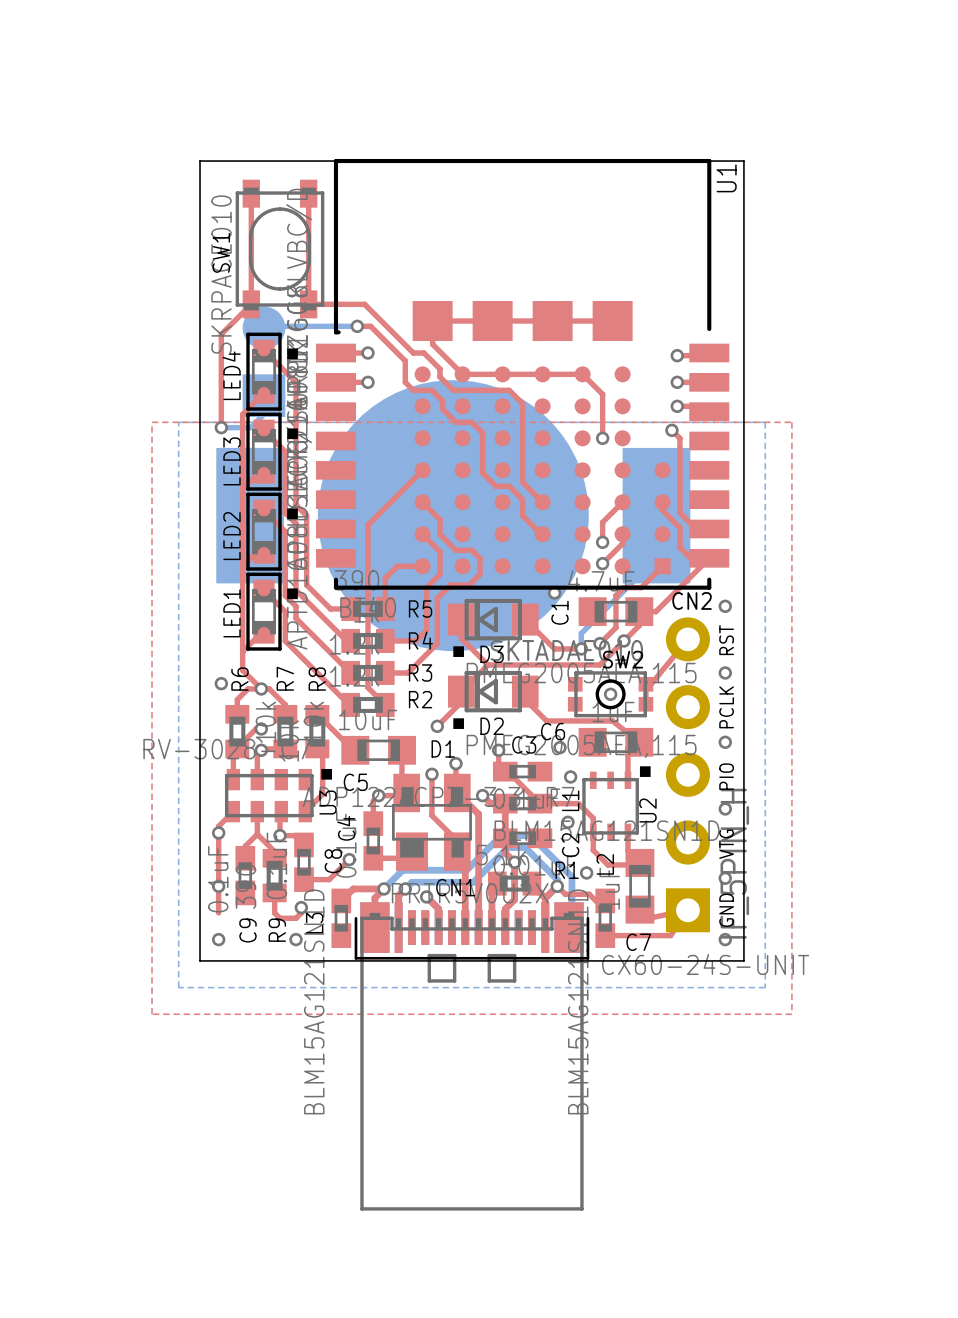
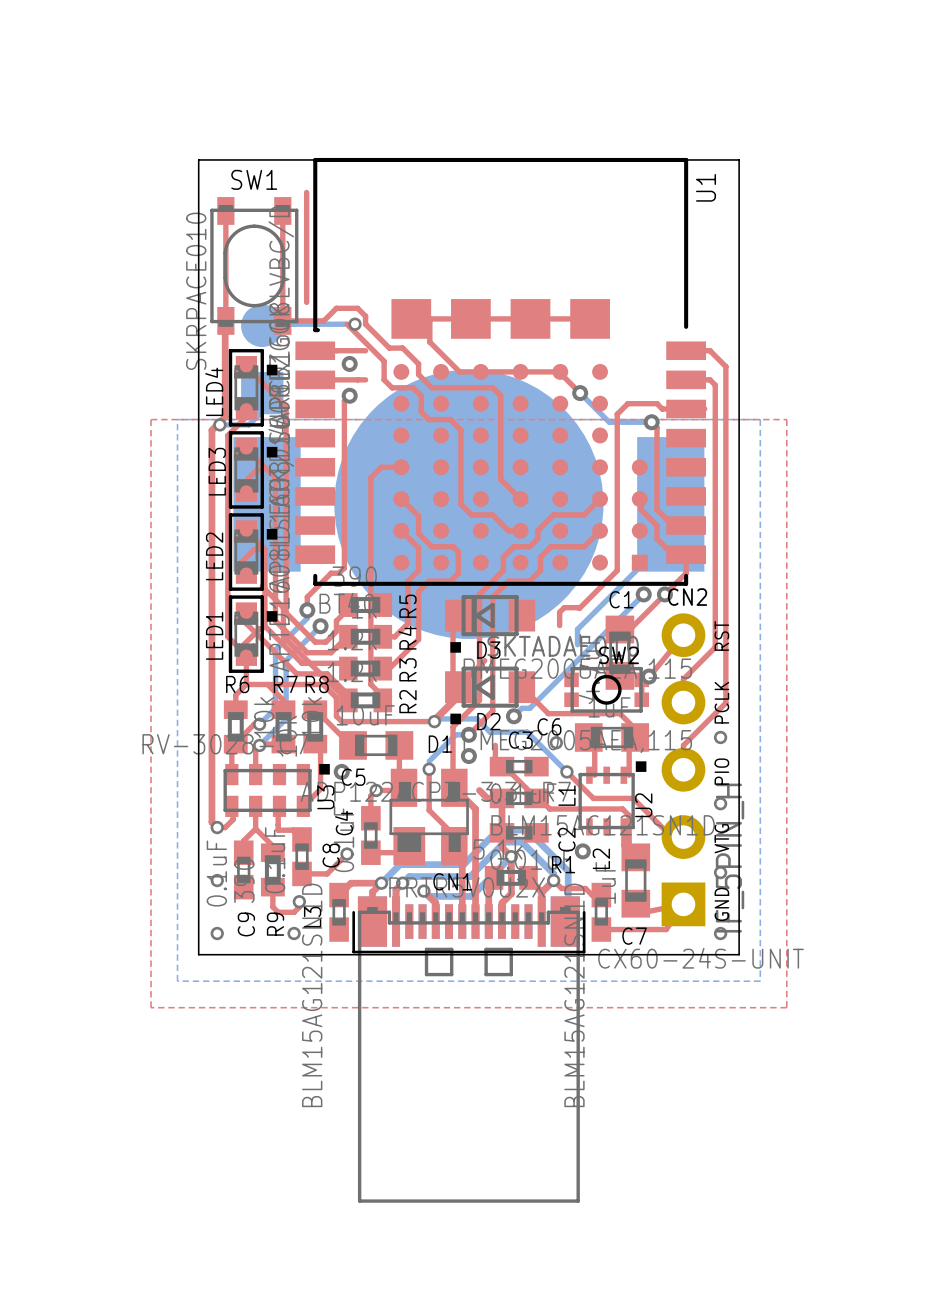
U1 name position: U1 (726, 178) -> U1 (706, 187)
top track: (251, 193) (251, 304) (221, 334) (221, 427) -> none
SW1 position: (279, 249) -> (254, 265)
SW1 name rotation: 0° (221, 252) -> 90° clockwise (254, 179)
SW1 name position: SW1 (221, 252) -> SW1 (254, 179)
top track: (311, 307) (308, 304) (364, 304) (413, 353) (423, 353) (439, 369) (439, 377) (453, 390) -> (282, 210) (282, 320) (323, 320) (336, 308) (357, 308) (365, 316) (365, 324) (389, 348) (402, 348) (418, 363) (418, 374) (431, 387) (450, 387)
top track: (357, 326) (370, 326) (405, 361) (405, 382) (413, 390) -> (347, 324) (384, 361) (384, 379) (392, 387) (410, 387)
top track: (263, 350) (295, 382) (295, 504) (306, 515) (306, 584) (330, 608) (350, 608) -> none
drawing position: (292, 353) -> (272, 370)
via: (367, 353) -> none
top track: none -> (686, 350) (709, 350) (725, 366) (725, 703) (683, 745) (683, 769)
via: (677, 355) -> none
via: none -> (349, 363)
top track: none -> (246, 366) (286, 406) (286, 612) (315, 642) (325, 642) (336, 631) (336, 620) (353, 605)
LED4 position: (263, 371) -> (246, 387)
U1 position: (522, 374) -> (500, 371)
top track: (563, 374) (582, 374) (602, 394) (602, 438) -> (560, 371) (580, 393)
via: (367, 382) -> none
via: (677, 382) -> none
top track: none -> (704, 379) (709, 379) (715, 385) (715, 647) (683, 679) (683, 702)
top track: (415, 390) (431, 390) (442, 401) (442, 409) (455, 422) (471, 422) (482, 432) (482, 472) (495, 486) (509, 486) (522, 499) (522, 515) (543, 535) -> (413, 387) (421, 395) (421, 411) (429, 419) (450, 419) (460, 430) (460, 504) (471, 514) (492, 514) (508, 530) (520, 530)
top track: (495, 390) (509, 390) (522, 403) (522, 482) (542, 502) -> (492, 387) (500, 395) (500, 479) (520, 499)
top track: (263, 393) (242, 414) (242, 670) (261, 688) -> none
bottom track: none -> (580, 393) (609, 422) (651, 422)
via: none -> (580, 393)
top track: none -> (349, 395) (344, 401) (344, 567) (339, 573) (331, 573) (307, 597) (307, 610)
via: none -> (349, 395)
via: (677, 406) -> none
top track: none -> (246, 408) (246, 416) (227, 435) (227, 636) (246, 655) (246, 684)
top track: none -> (686, 408) (662, 408) (656, 403) (627, 403) (617, 414) (617, 570) (579, 608) (564, 607) (559, 612) (559, 625)
top track: none -> (651, 422) (656, 427) (656, 509) (672, 525) (686, 525)
via: none -> (651, 422)
top track: (263, 430) (285, 451) (285, 512) (295, 523) (295, 590) (346, 640) (350, 640) -> none
top track: (671, 430) (679, 438) (679, 512) (695, 528) (709, 528) -> none
via: (671, 430) -> none
drawing position: (292, 433) -> (272, 452)
via: (602, 438) -> none
top track: none -> (246, 448) (275, 477) (275, 620) (307, 652) (331, 652) (344, 639) (353, 636)
LED3 position: (263, 451) -> (246, 469)
LED3 name position: LED3 (231, 461) -> LED3 (217, 471)
top track: none -> (401, 467) (381, 467) (370, 477) (370, 684) (388, 700)
top track: (422, 470) (367, 524) (367, 687) (385, 704) -> none
top track: (422, 502) (439, 519) (439, 534) (455, 550) (471, 550) (479, 558) (479, 574) (469, 584) (453, 584) -> (401, 499) (418, 516) (418, 533) (431, 546) (453, 546) (458, 552) (458, 573) (450, 581)
top track: none -> (600, 499) (584, 514) (553, 514) (537, 530) (537, 538) (529, 546) (513, 546) (503, 557) (503, 570) (479, 594) (479, 700) (453, 726) (453, 758)
top track: (622, 502) (602, 522) (602, 542) -> none
top track: (662, 502) (662, 510) (679, 527) (679, 547) (690, 558) (709, 558) (690, 576) -> (639, 499) (641, 509) (656, 525) (656, 538) (672, 554) (686, 554) (686, 573)
drawing: [287, 508, 298, 520] -> none
top track: (263, 510) (285, 531) (285, 595) (295, 606) (295, 618) (350, 672) -> none
part position: (453, 515) -> (468, 504)
top track: (422, 530) (422, 534) (439, 551) (439, 574) (426, 587) (426, 630) (415, 640) (397, 640) -> (401, 530) (418, 548) (418, 570) (407, 581) (407, 623) (394, 636)
LED2 position: (263, 531) -> (246, 552)
drawing: none -> [266, 528, 278, 540]
top track: none -> (246, 530) (264, 549) (264, 626) (302, 663) (348, 663) (353, 668)
top track: none -> (600, 530) (584, 546) (551, 546) (540, 557) (540, 570) (529, 581) (508, 581) (492, 597) (492, 710) (468, 734)
top track: (622, 534) (622, 543) (602, 563) -> none
via: (602, 542) -> none
via: (602, 563) -> none
top track: (422, 566) (397, 566) (385, 578) (385, 608) -> none
top track: (662, 566) (641, 587) (623, 587) (615, 595) (615, 627) (599, 643) -> none
top track: (450, 584) (437, 598) (437, 643) (407, 672) (391, 672) -> (447, 581) (429, 581) (418, 591) (418, 639) (389, 668)
drawing: [287, 588, 298, 600] -> none
via: (554, 592) -> none
bottom track: none -> (643, 594) (529, 708) (521, 708) (513, 716)
via: none -> (643, 594)
via: none -> (664, 594)
via: (725, 606) -> none
R5 name rotation: 0° (420, 608) -> 90° counterclockwise (407, 606)
LED1 position: (263, 611) -> (246, 634)
C1 rotation: 0° (615, 611) -> 90° clockwise (619, 652)
C1 position: (615, 611) -> (619, 652)
top track: (655, 611) (639, 611) (639, 625) (599, 664) (487, 664) (461, 638) (461, 619) -> (651, 607) (632, 626) (622, 626) (619, 629)
bottom track: none -> (307, 610) (307, 618) (275, 650) (275, 708) (259, 724)
via: none -> (307, 610)
drawing: none -> [266, 611, 278, 622]
top track: none -> (246, 612) (246, 623) (296, 673) (327, 673) (353, 700)
top track: none -> (453, 615) (453, 700) (431, 721) (341, 721) (336, 716) (336, 697) (323, 684) (267, 684)
top track: (525, 619) (554, 648) (581, 648) -> none
bottom track: none -> (320, 626) (286, 660) (286, 718) (259, 745)
via: none -> (320, 626)
R4 name rotation: 0° (420, 640) -> 90° counterclockwise (407, 637)
via: (623, 640) -> none
via: (599, 643) -> none
via: (581, 648) -> none
R3 name rotation: 0° (420, 672) -> 90° counterclockwise (407, 669)
via: (725, 672) -> none
R7 name rotation: 0° (285, 678) -> 90° clockwise (285, 684)
R6 name rotation: 0° (239, 679) -> 90° clockwise (237, 684)
R8 name rotation: 0° (317, 679) -> 90° clockwise (317, 684)
via: none -> (649, 676)
via: (221, 683) -> none
top track: none -> (516, 681) (548, 713) (619, 713) (635, 728) (640, 740) (629, 743) (629, 775)
via: (261, 688) -> none
top track: (525, 691) (525, 699) (546, 720) (612, 720) (639, 742) (627, 748) (627, 780) -> none
via: (610, 694) -> none
R2 name rotation: 0° (420, 699) -> 90° counterclockwise (407, 701)
via: none -> (513, 716)
bottom track: none -> (431, 721) (434, 718) (476, 718) (490, 732) (527, 732) (572, 777)
bottom track: none -> (468, 734) (455, 734) (429, 761)
via: none -> (468, 734)
top track: none -> (594, 740) (594, 775)
via: (498, 750) -> none
via: none -> (468, 756)
via: (455, 763) -> none
via: none -> (341, 771)
top track: none -> (572, 777) (593, 798) (633, 798) (671, 837) (683, 837)
via: (482, 795) -> none
top track: (542, 803) (578, 803) (593, 818) (593, 850) (607, 864) (637, 864) -> (539, 798) (549, 809) (622, 809) (629, 815) (629, 850)
top track: (233, 811) (218, 826) (218, 912) -> (231, 806) (233, 819) (225, 827) (217, 827) (211, 822) (211, 430) (225, 416) (225, 210)
via: (567, 822) -> none
via: (279, 835) -> none
via: none -> (582, 851)
bottom track: none -> (511, 856) (471, 896) (429, 896)
via: (586, 872) -> none

